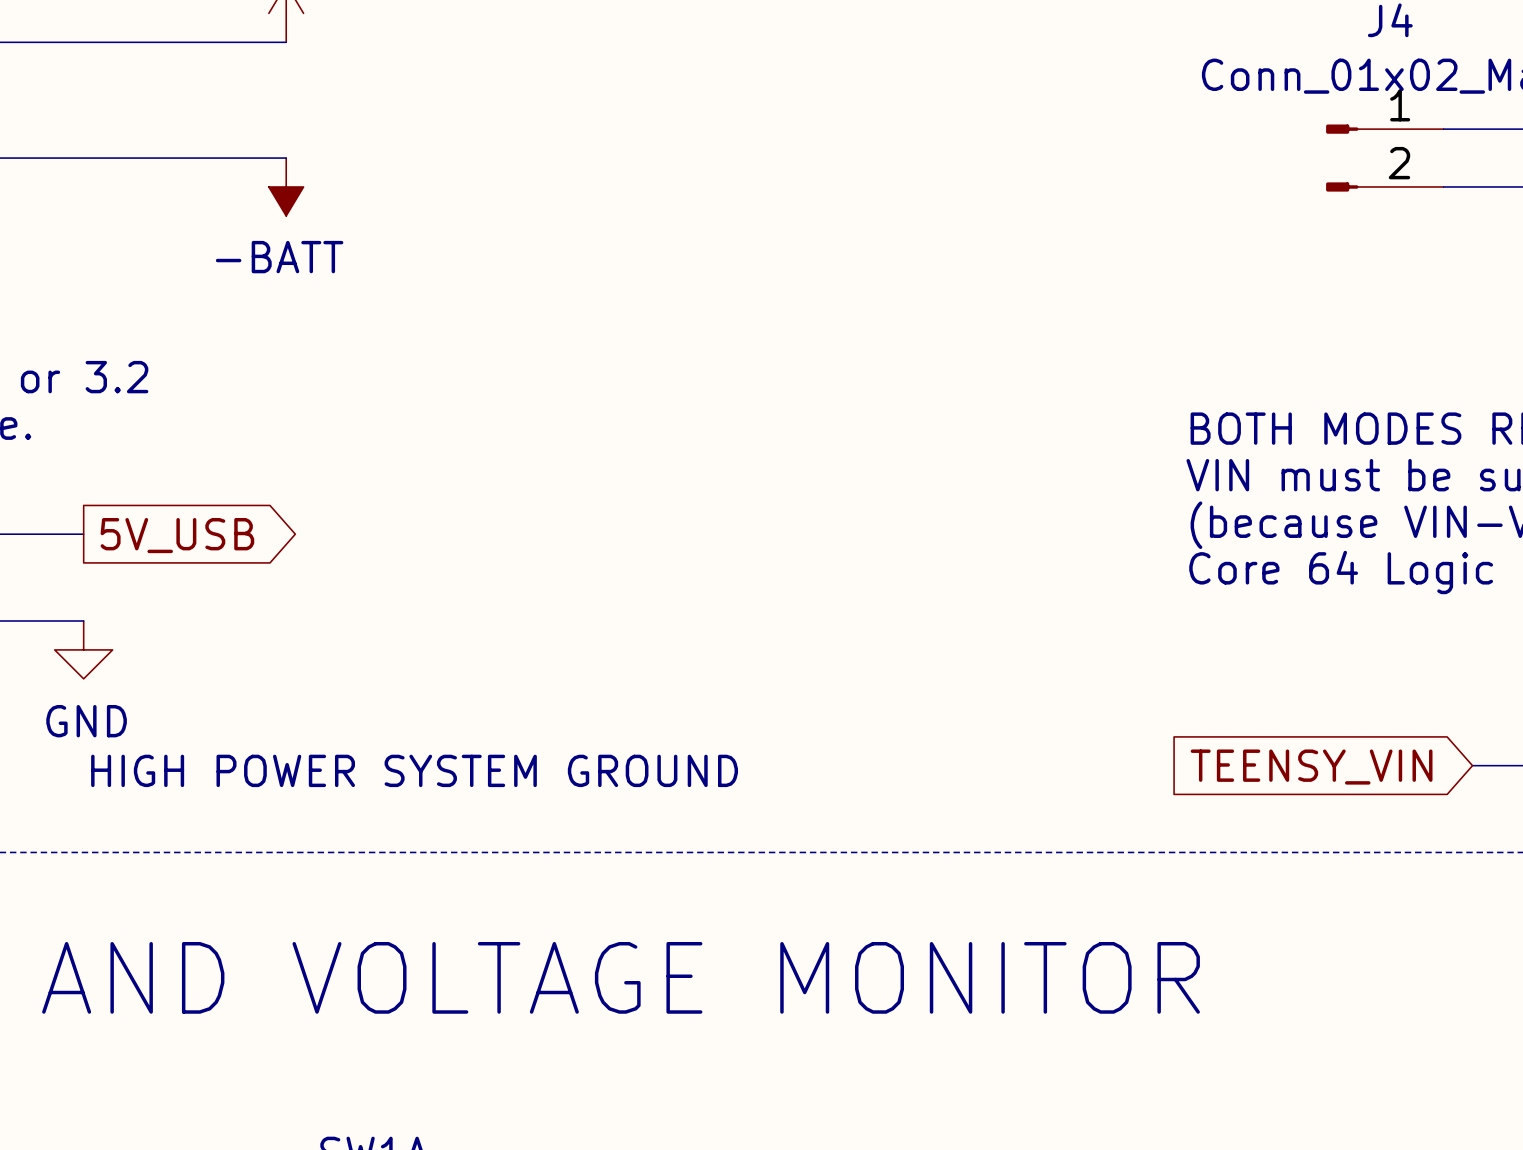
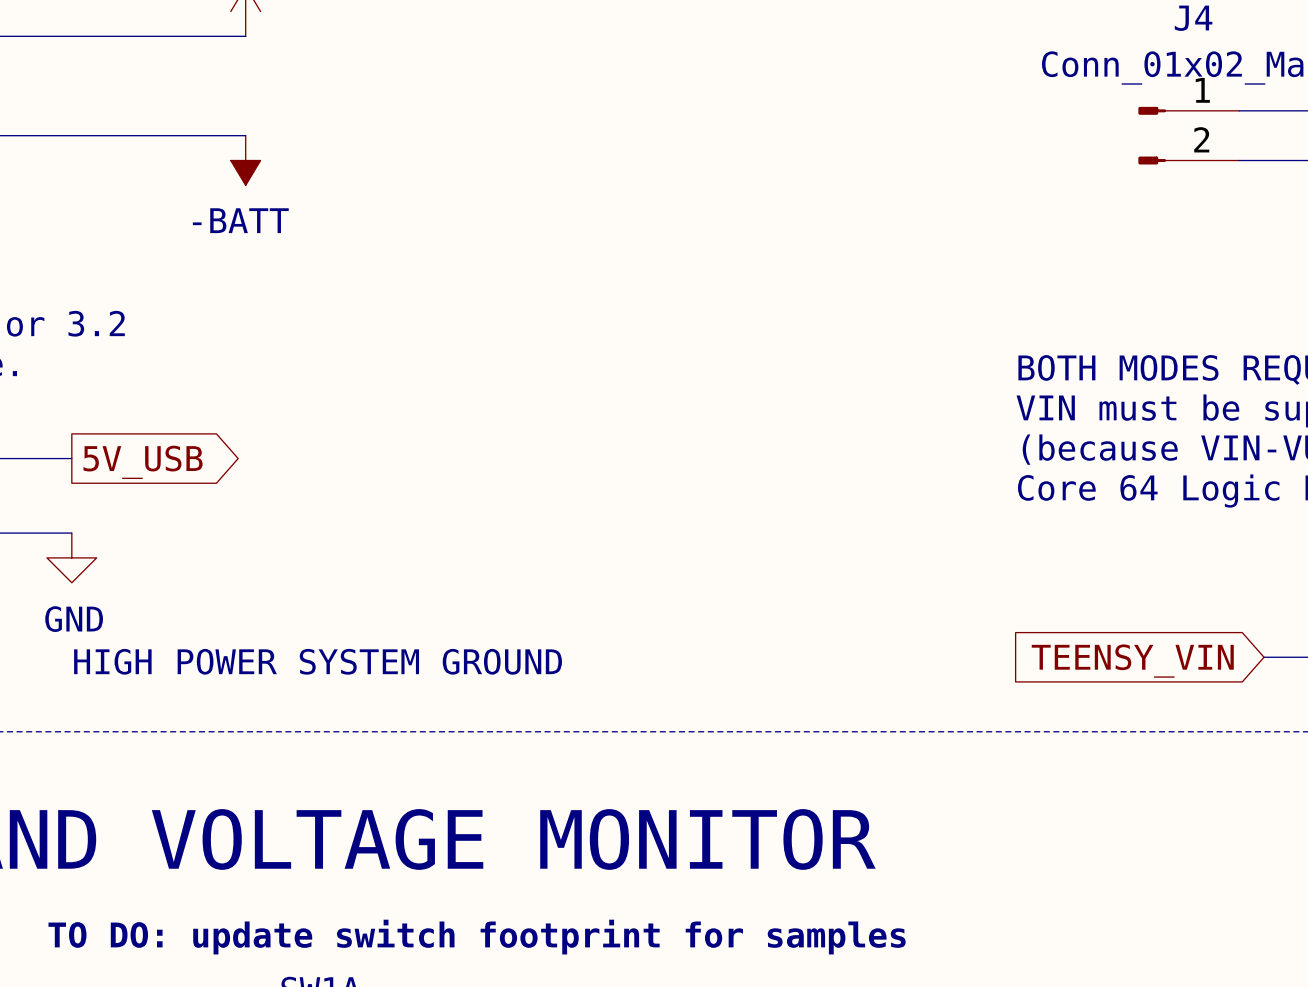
text: none -> TO DO: update switch footprint for samples (477, 937)

